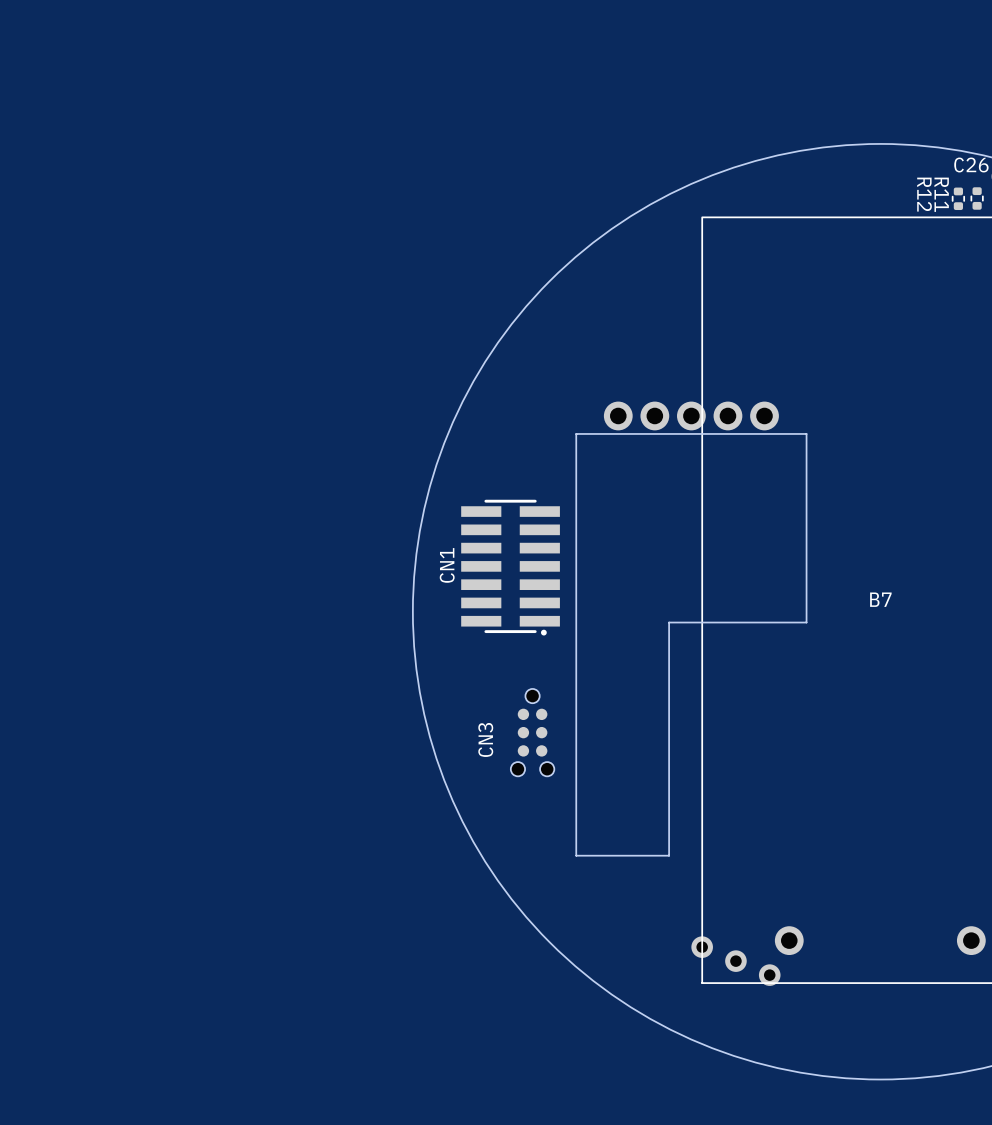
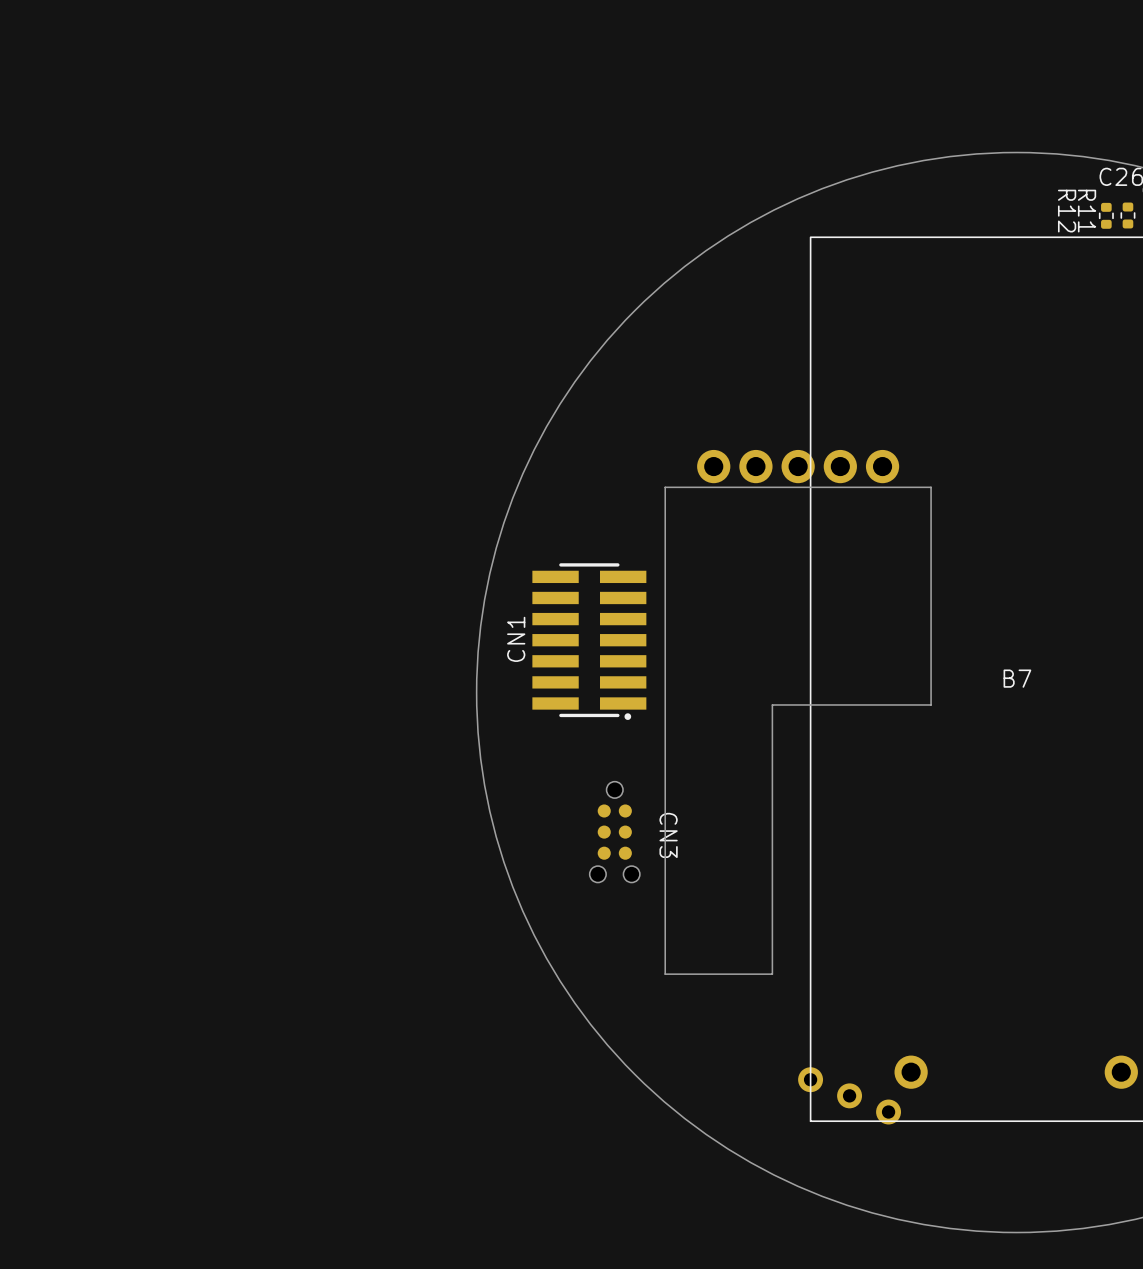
CN3 name rotation: 0° (485, 739) -> 180° (668, 835)
CN3 name position: CN3 (485, 739) -> CN3 (668, 835)

